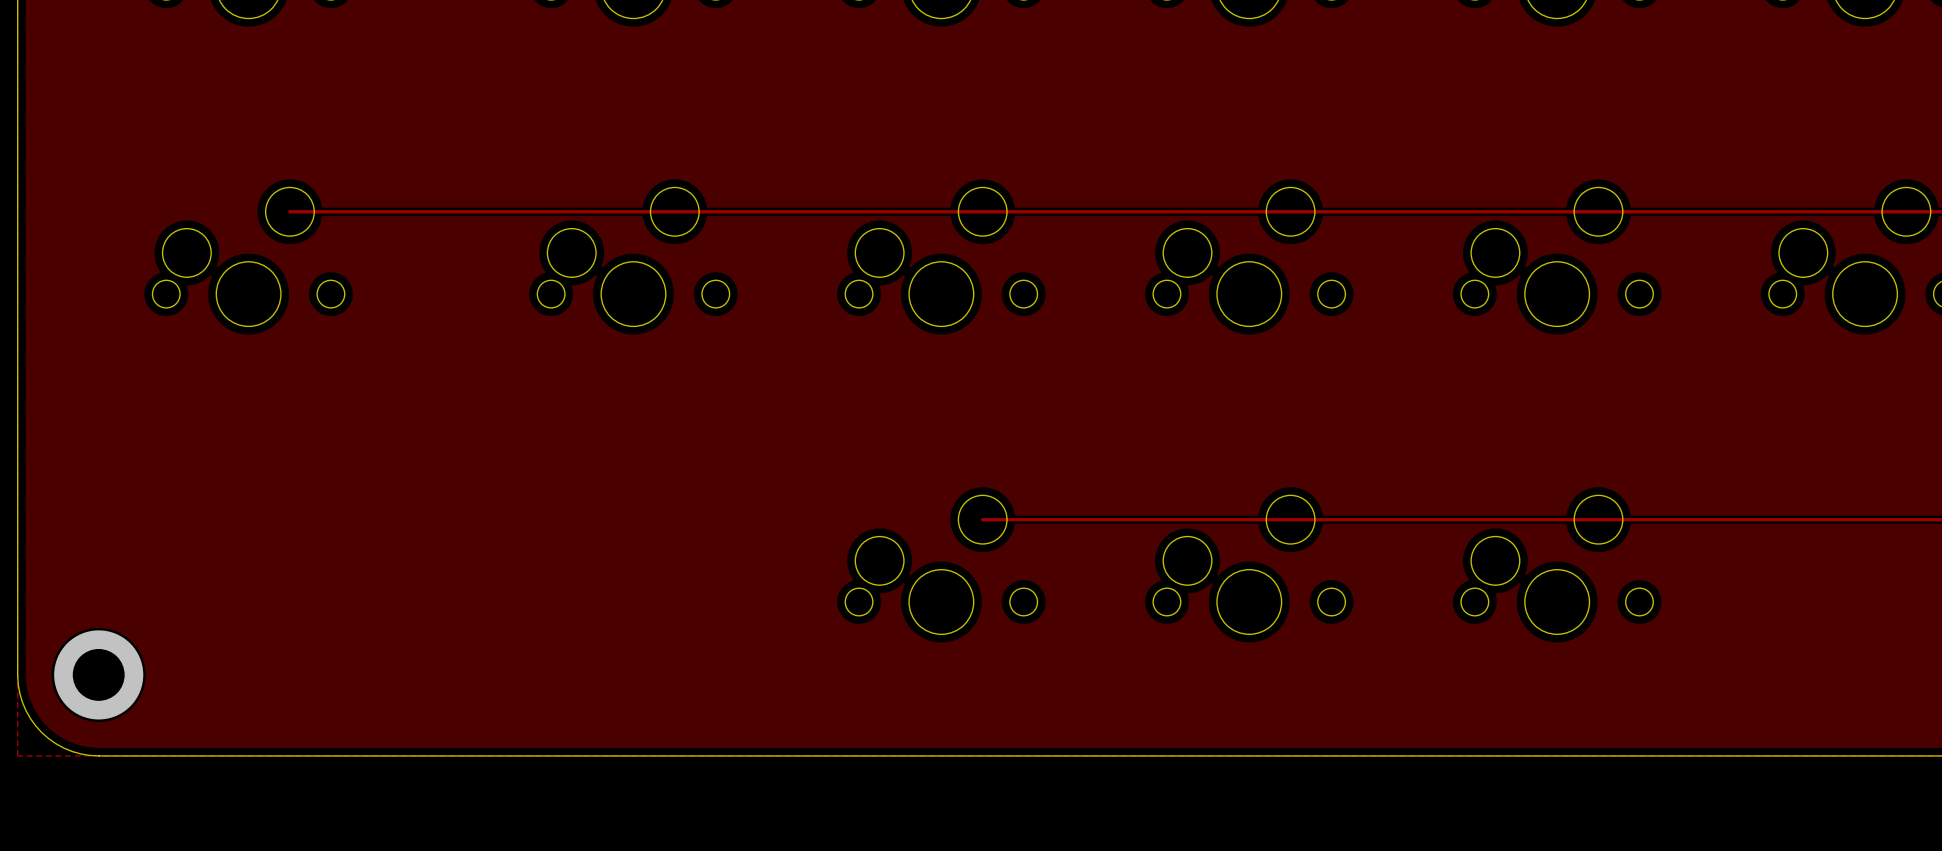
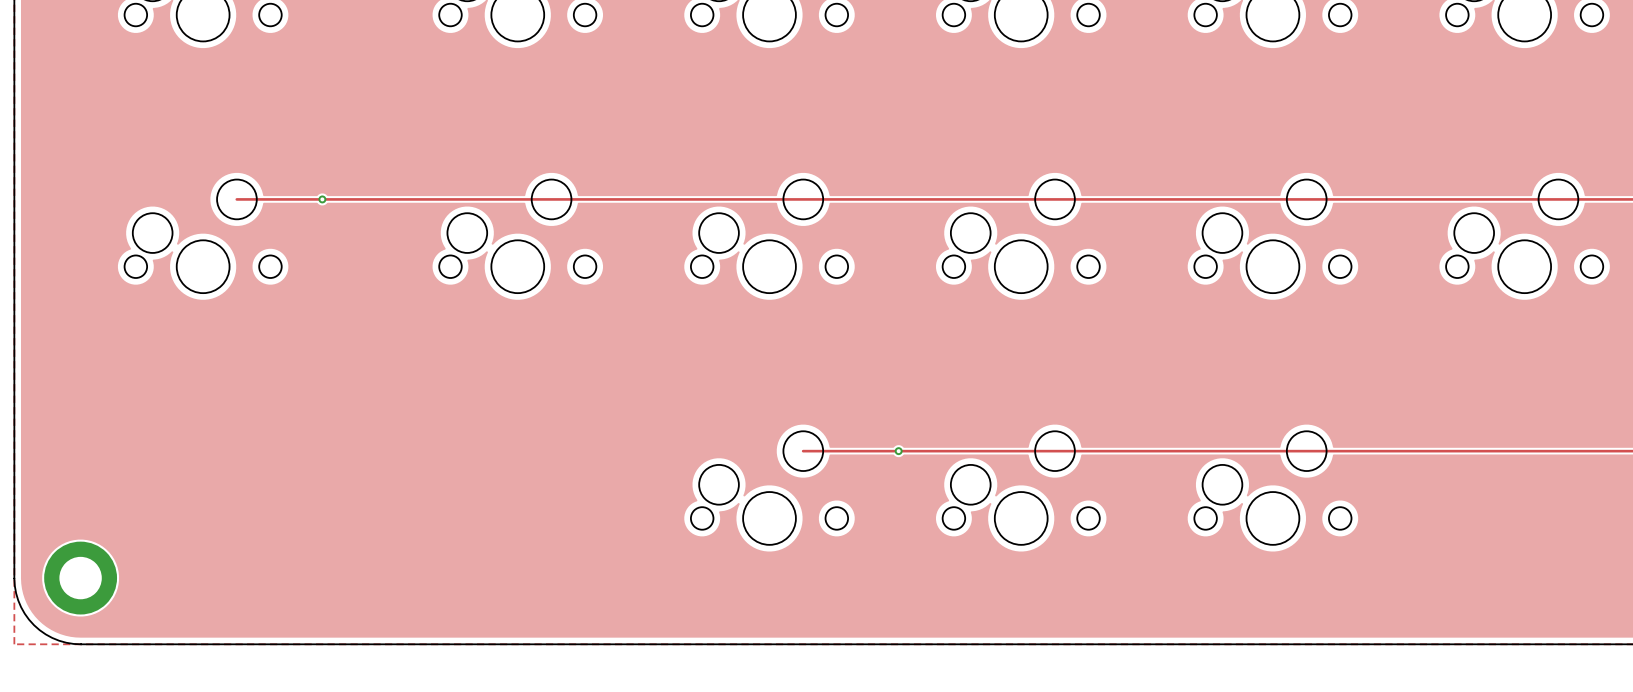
via: none -> (322, 199)
via: none -> (898, 451)

